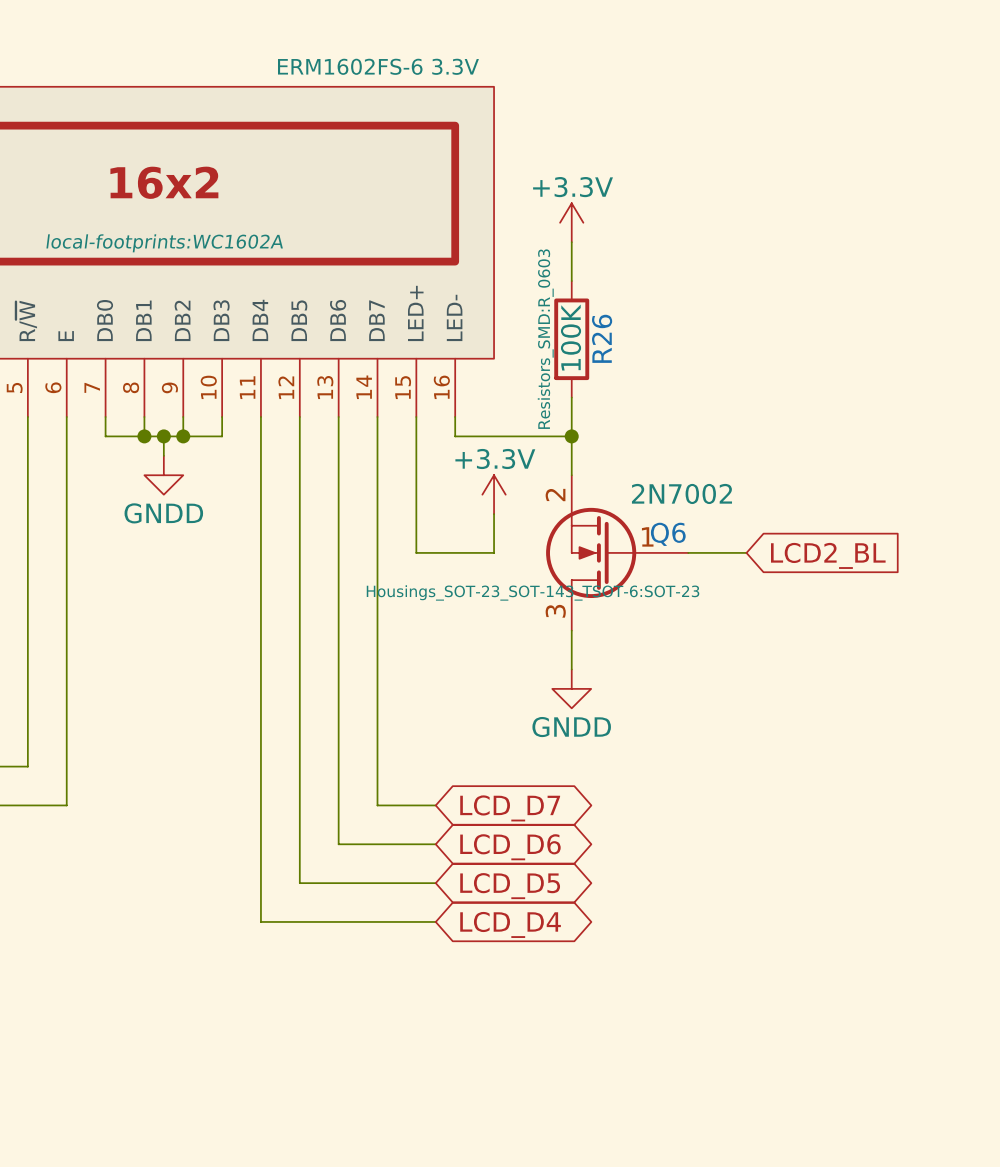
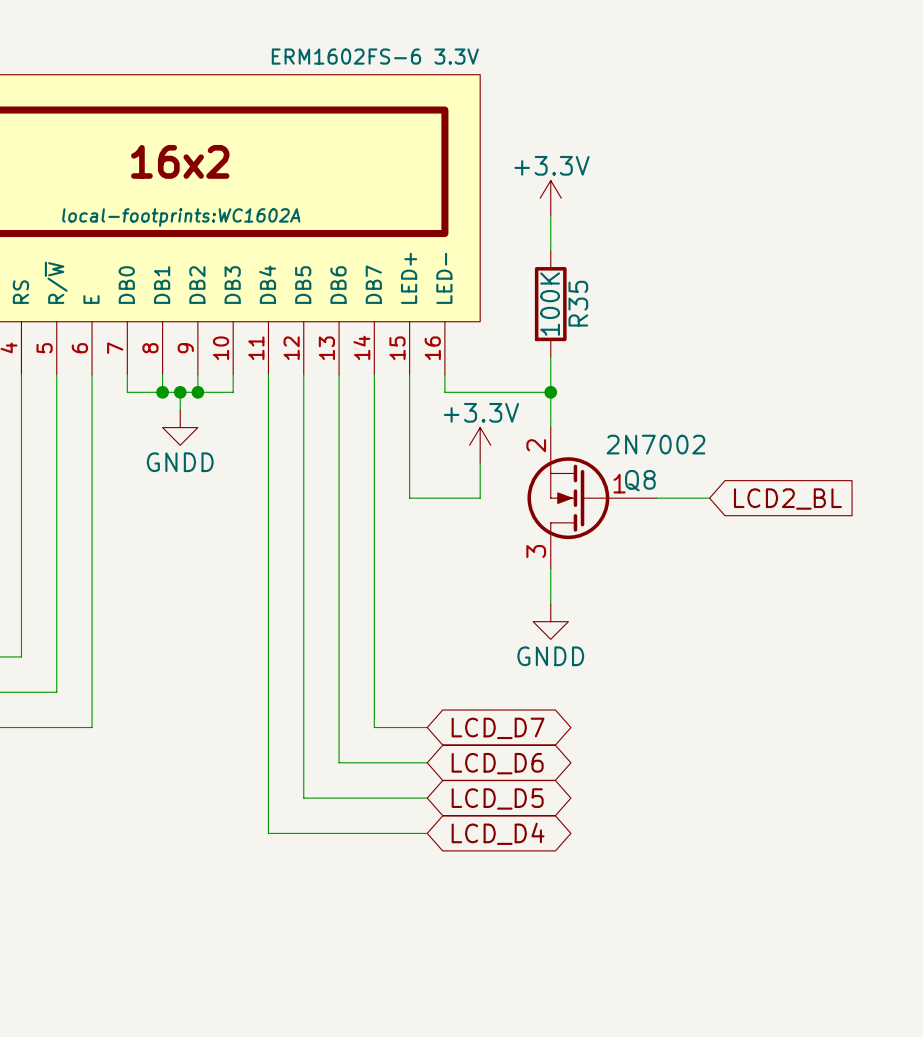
R26 name: R26 (602, 338) -> R35 (578, 303)
R26 text: Resistors_SMD:R_0603 (545, 339) -> none
Q6 name: Q6 (668, 534) -> Q8 (640, 480)
Q6 text: Housings_SOT-23_SOT-143_TSOT-6:SOT-23 (533, 592) -> none

